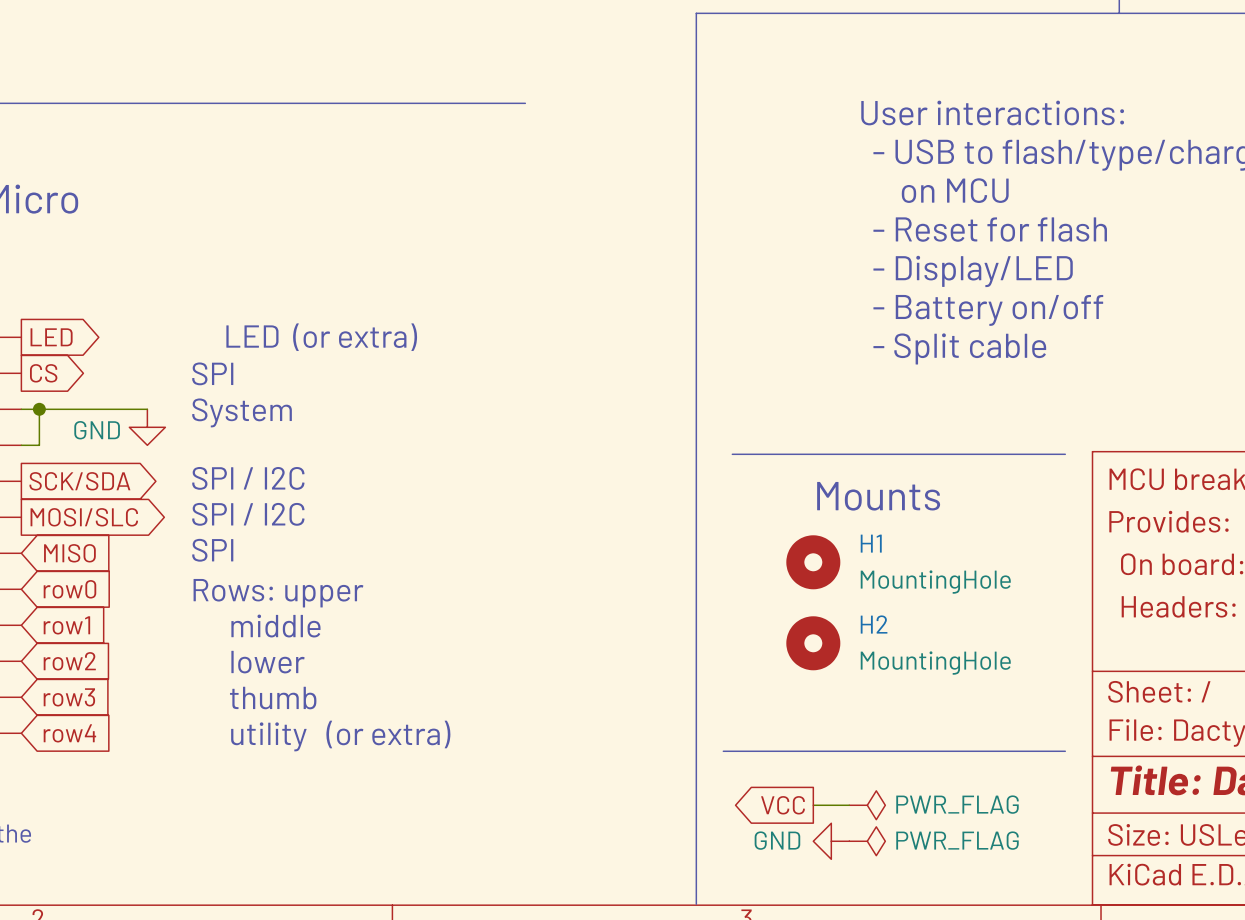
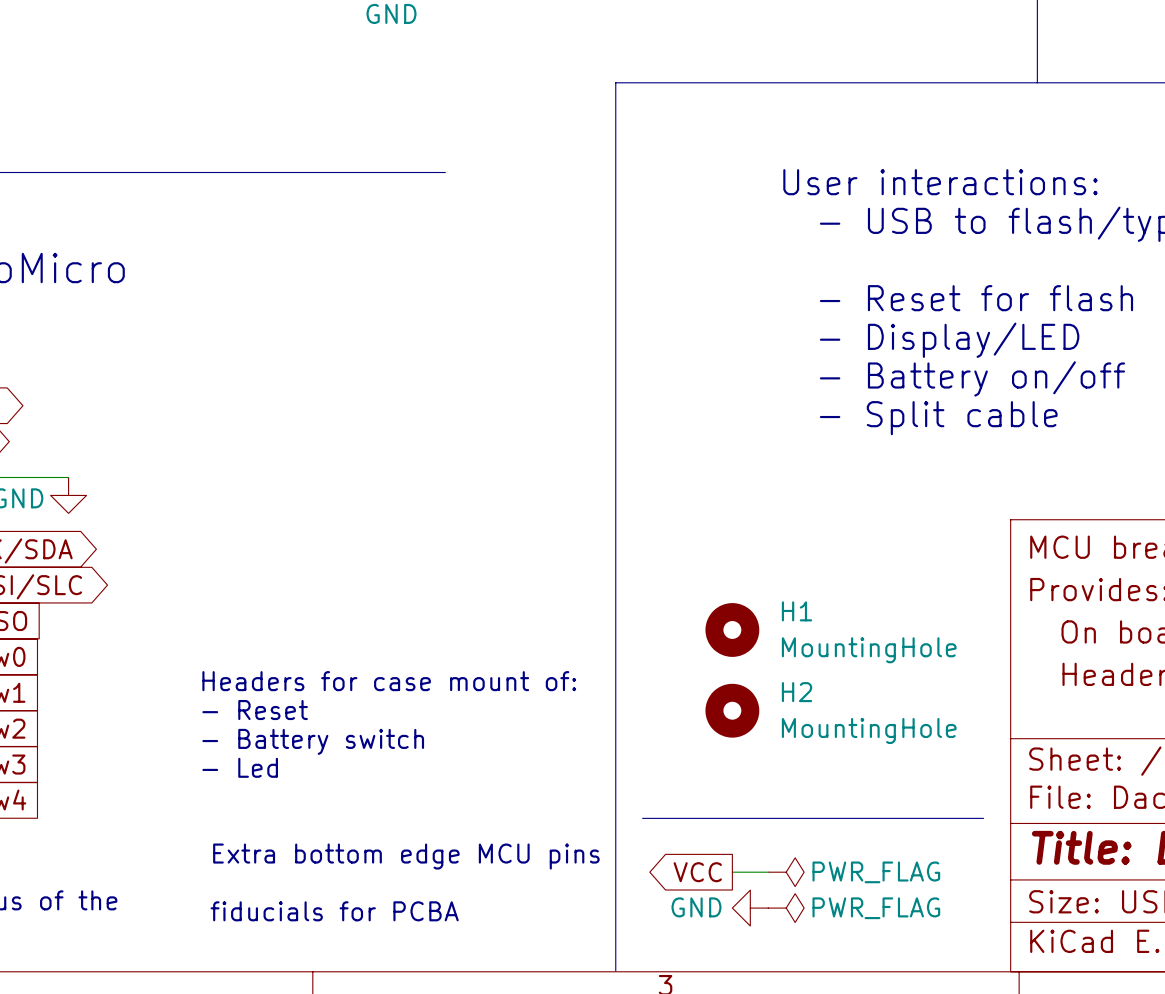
text: on MCU (955, 190) -> none
text: LED (or extra) (321, 337) -> none
text: SPI (212, 373) -> none
text: System (242, 412) -> none
line: (732, 454) (1065, 454) -> none
text: SPI / I2C (248, 478) -> none
text: Mounts (878, 496) -> none
text: SPI / I2C (248, 514) -> none
text: SPI (212, 550) -> none
text: Rows: upper (278, 593) -> none
text: none -> Headers for case mount of: (389, 681)
text: middle (275, 626) -> none
text: none -> - Reset (255, 710)
text: lower (268, 662) -> none
text: none -> - Battery switch (313, 741)
text: thumb (273, 698) -> none
text: none -> - Led (240, 767)
text: utility (or extra) (340, 736) -> none
text: none -> Extra bottom edge MCU pins (406, 856)
text: none -> fiducials for PCBA (334, 911)

